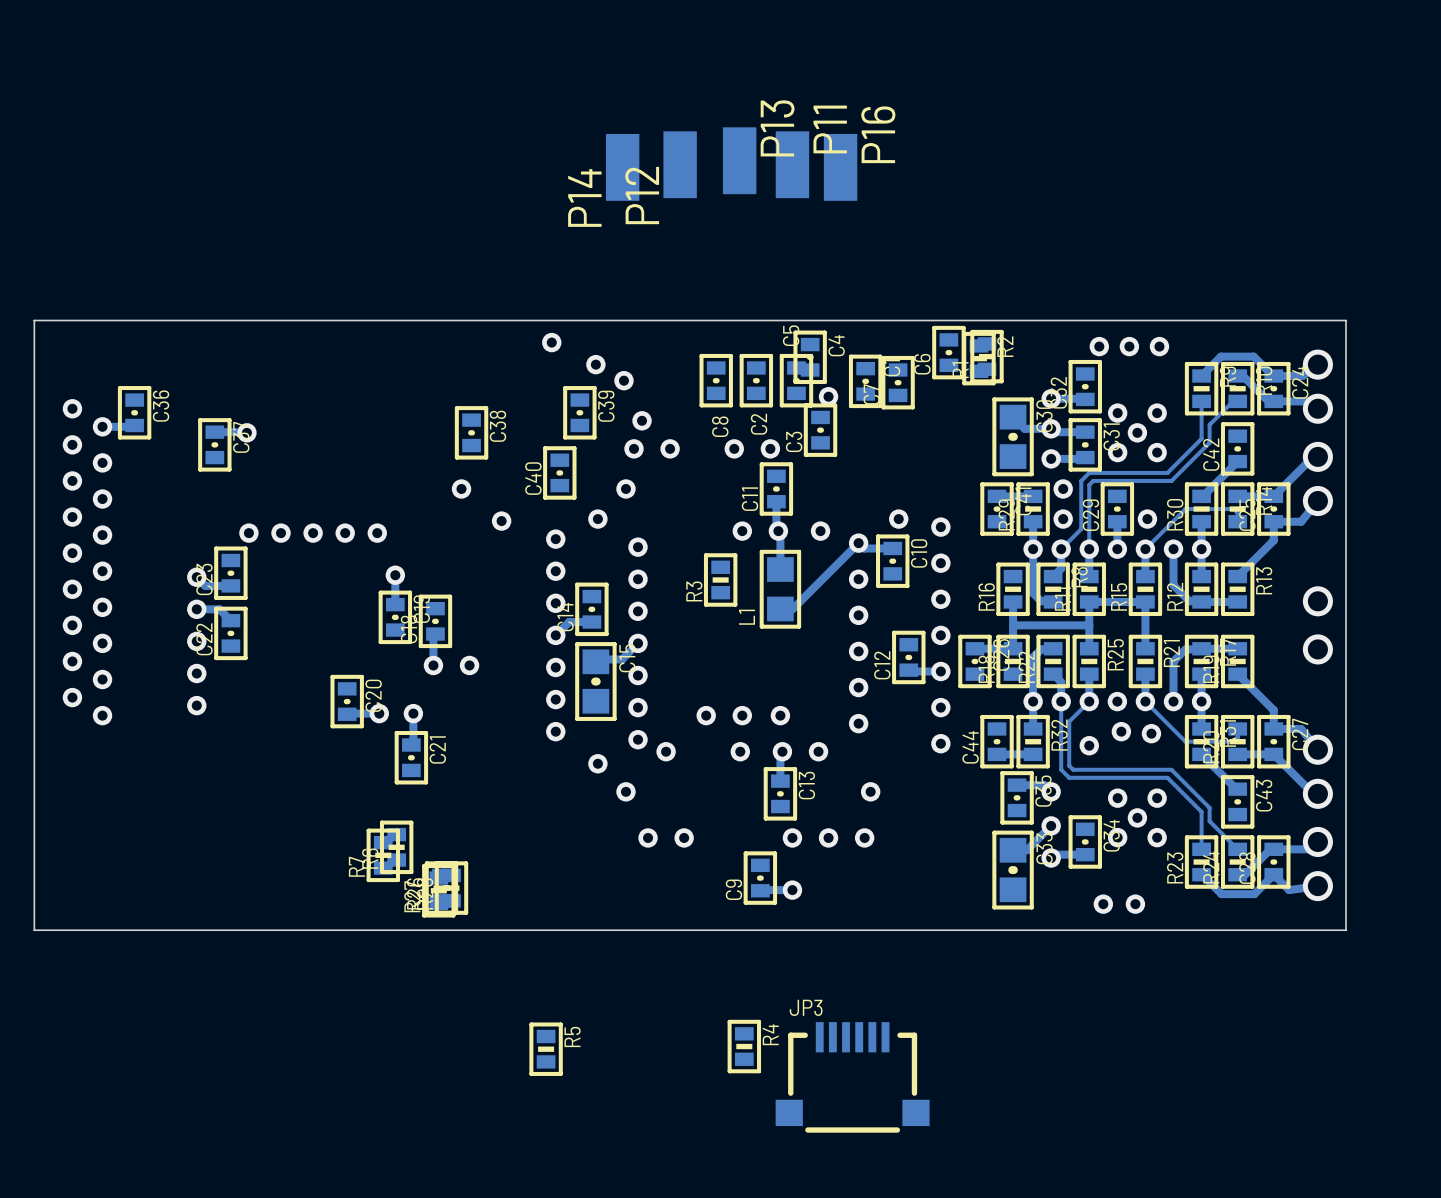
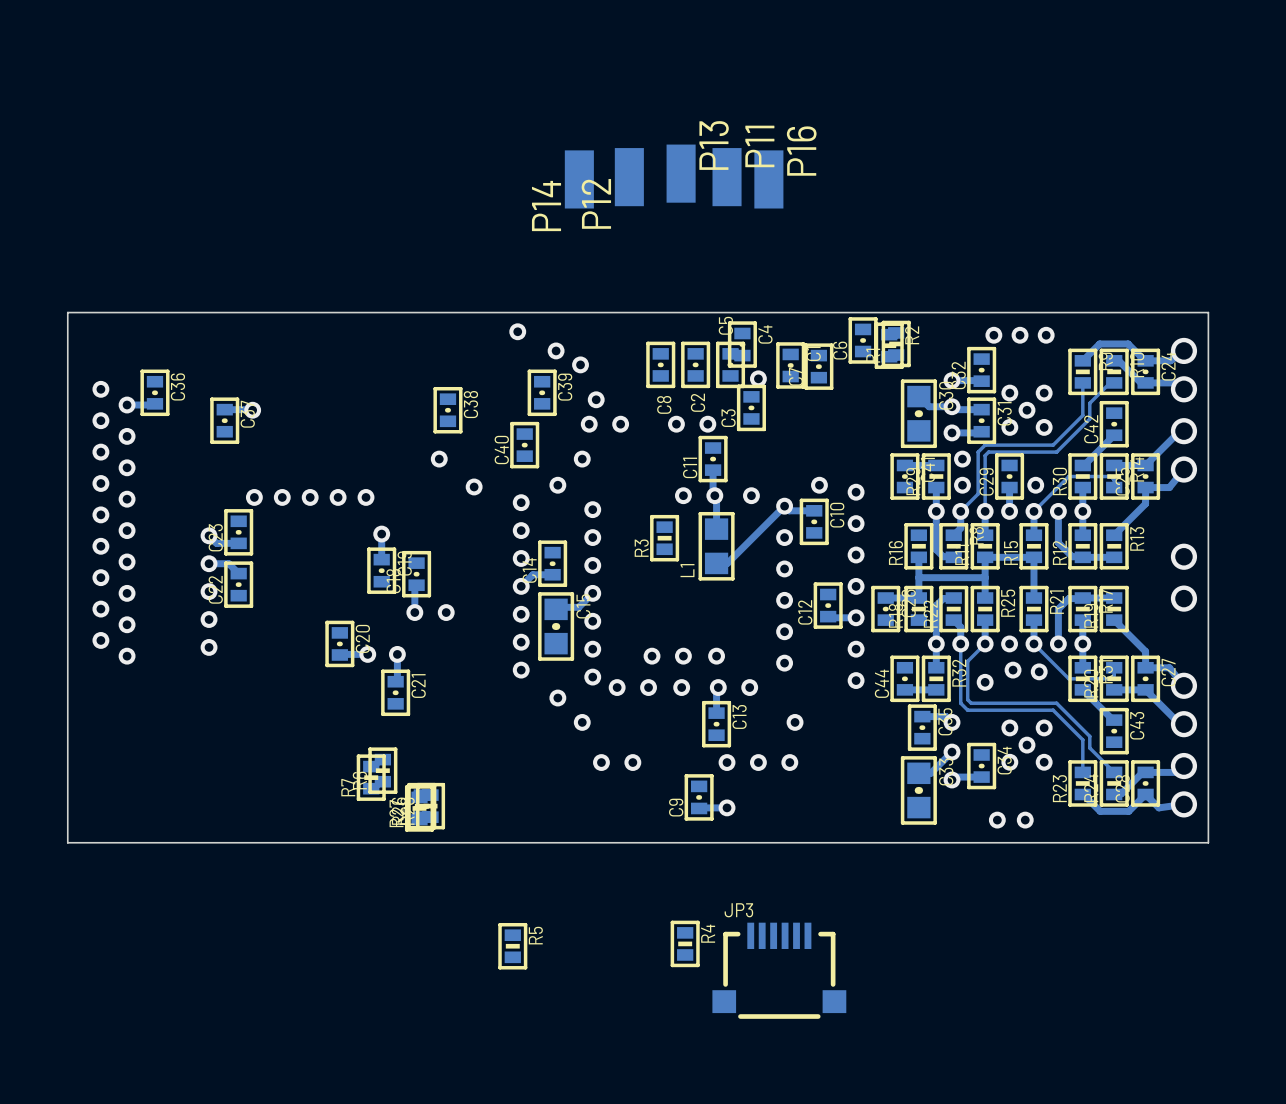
via: none -> (648, 687)

